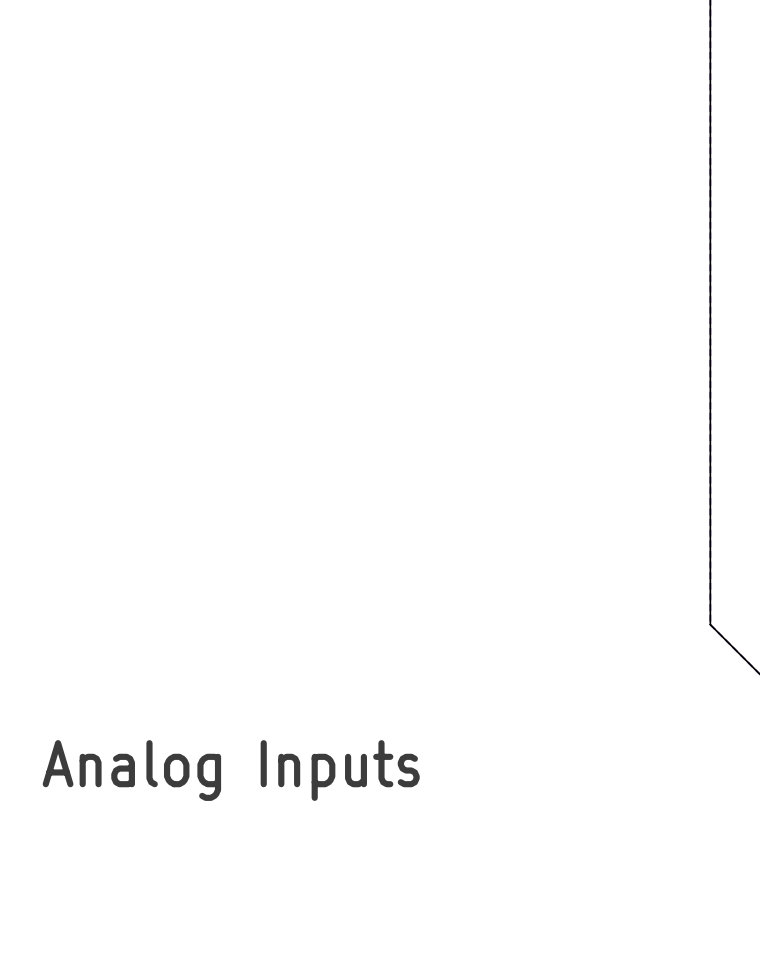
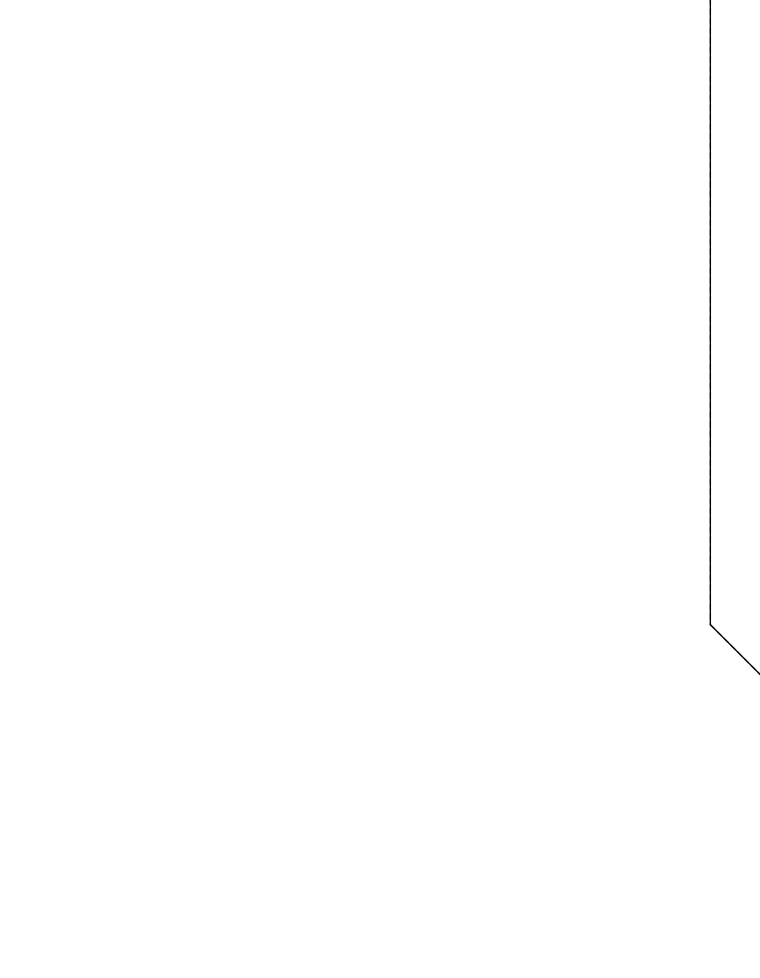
text: Analog Inputs (231, 770) -> none

